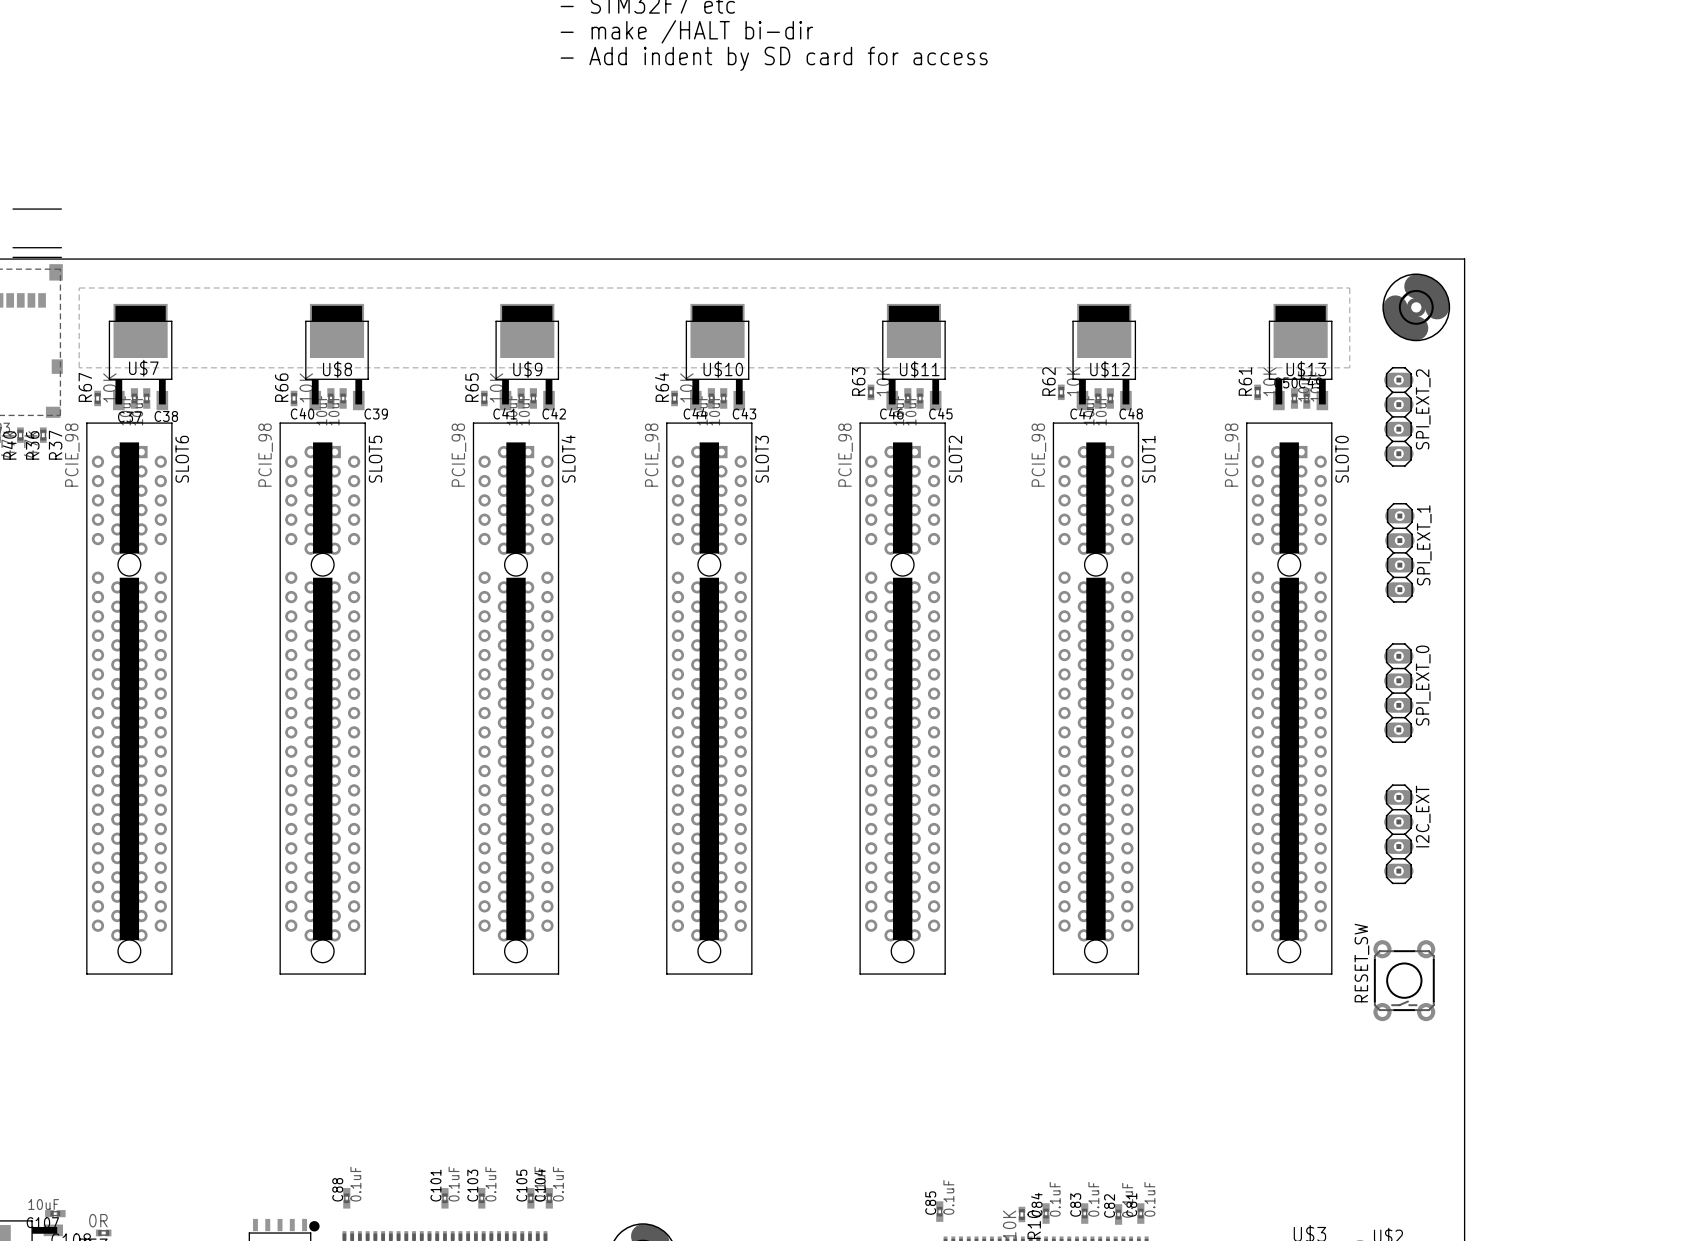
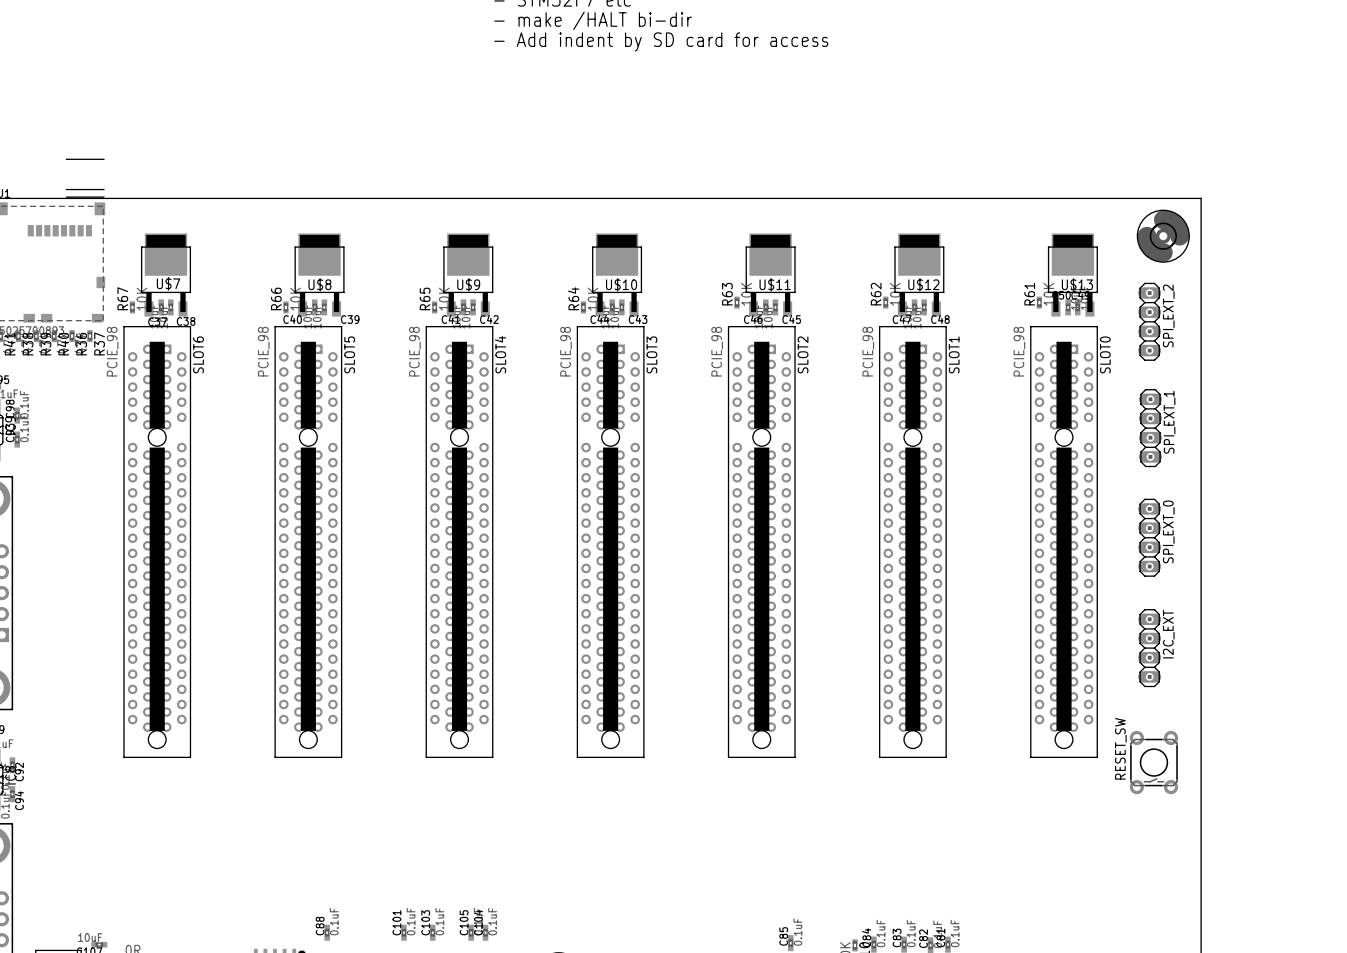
zone outline: (79, 287) (1349, 287) (1349, 367) (79, 367) (79, 287) -> none

